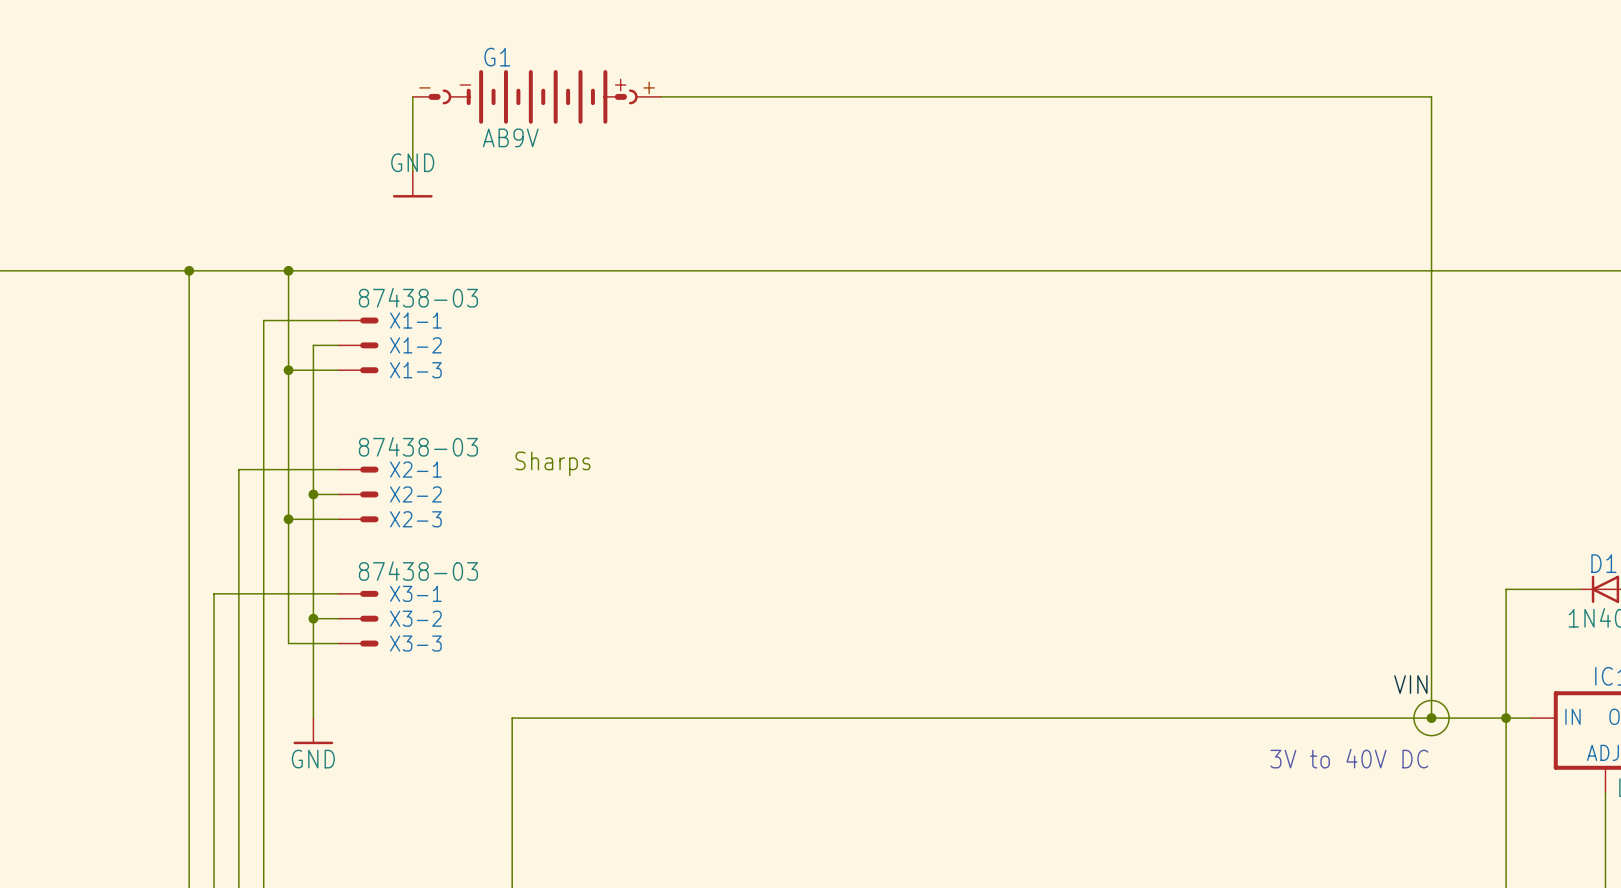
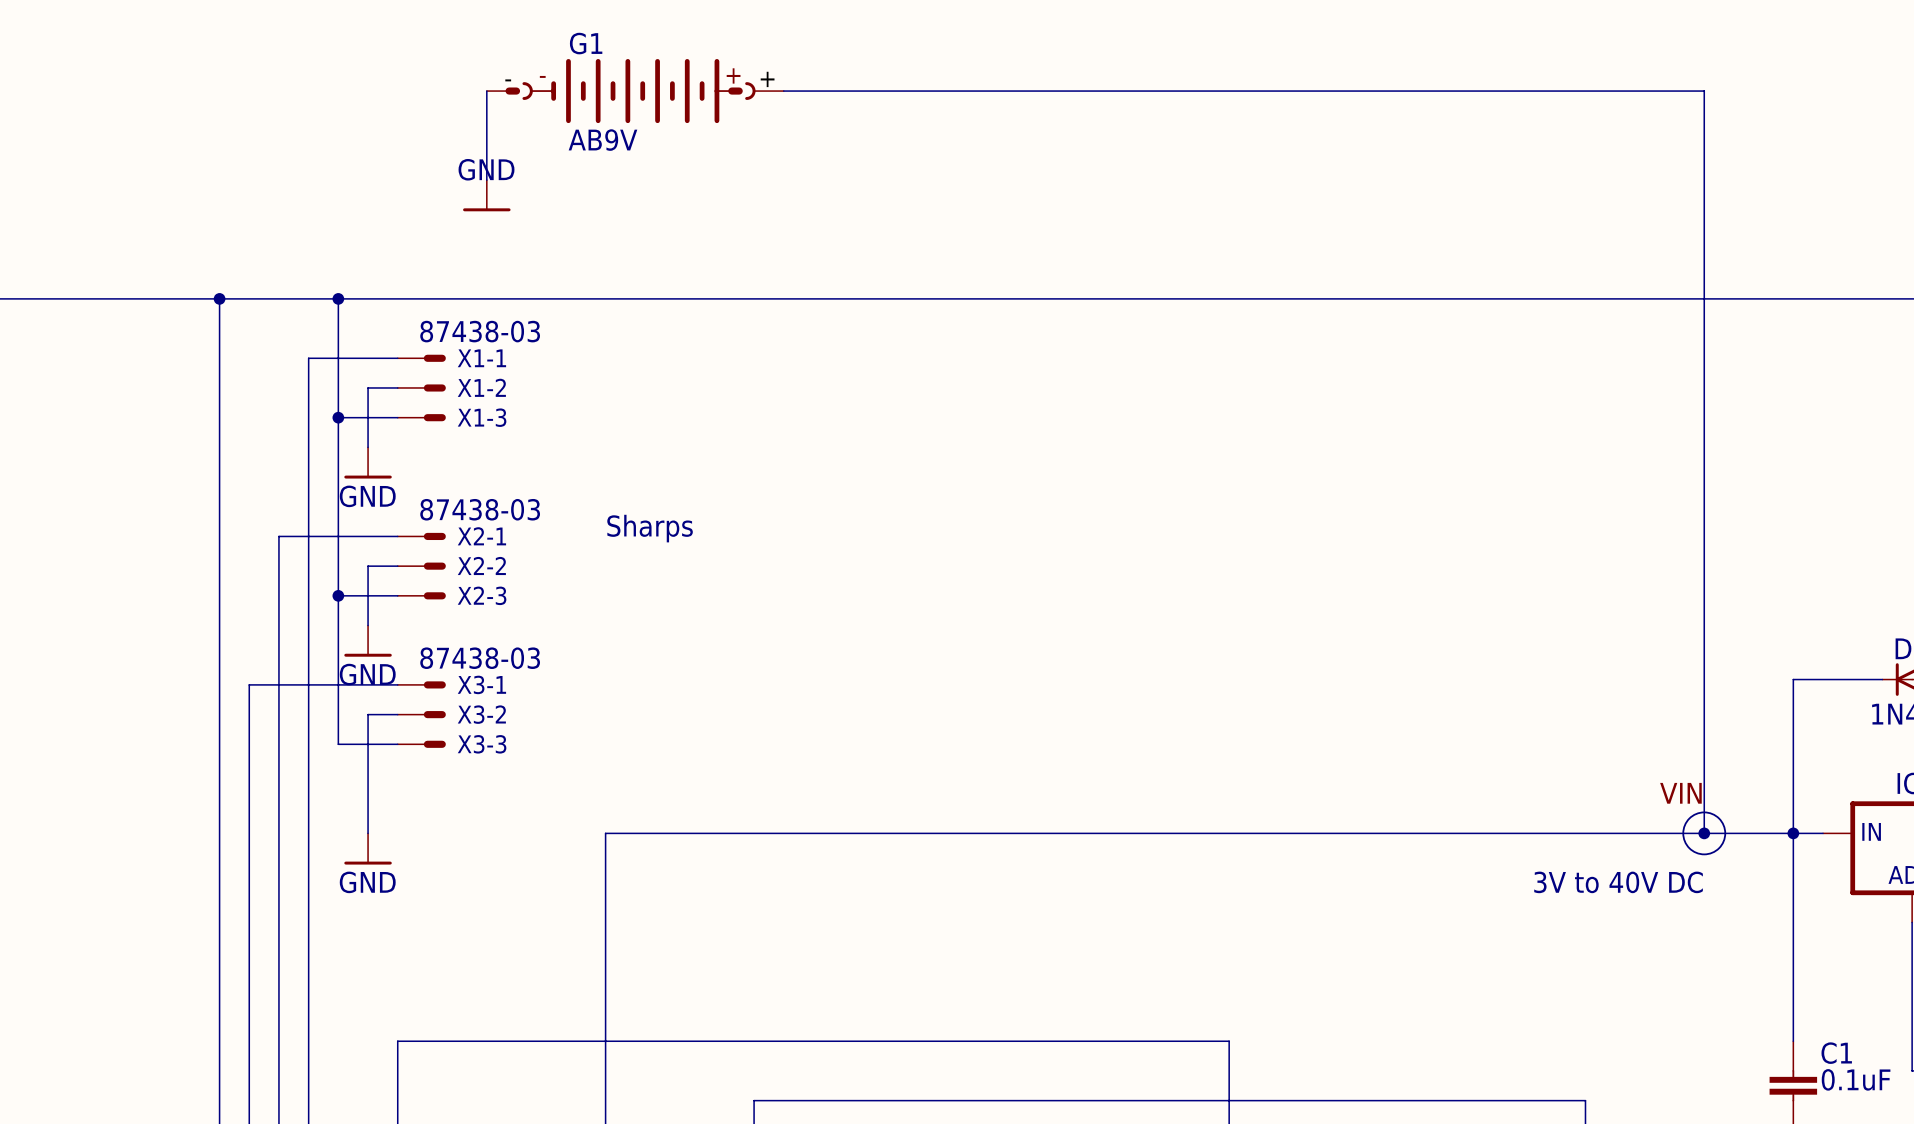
wire: (313, 395) (313, 494) -> none
power symbol: none -> GND (368, 462)
junction: (313, 494) -> none
wire: (313, 544) (313, 618) -> none
power symbol: none -> GND (368, 641)
junction: (313, 618) -> none

